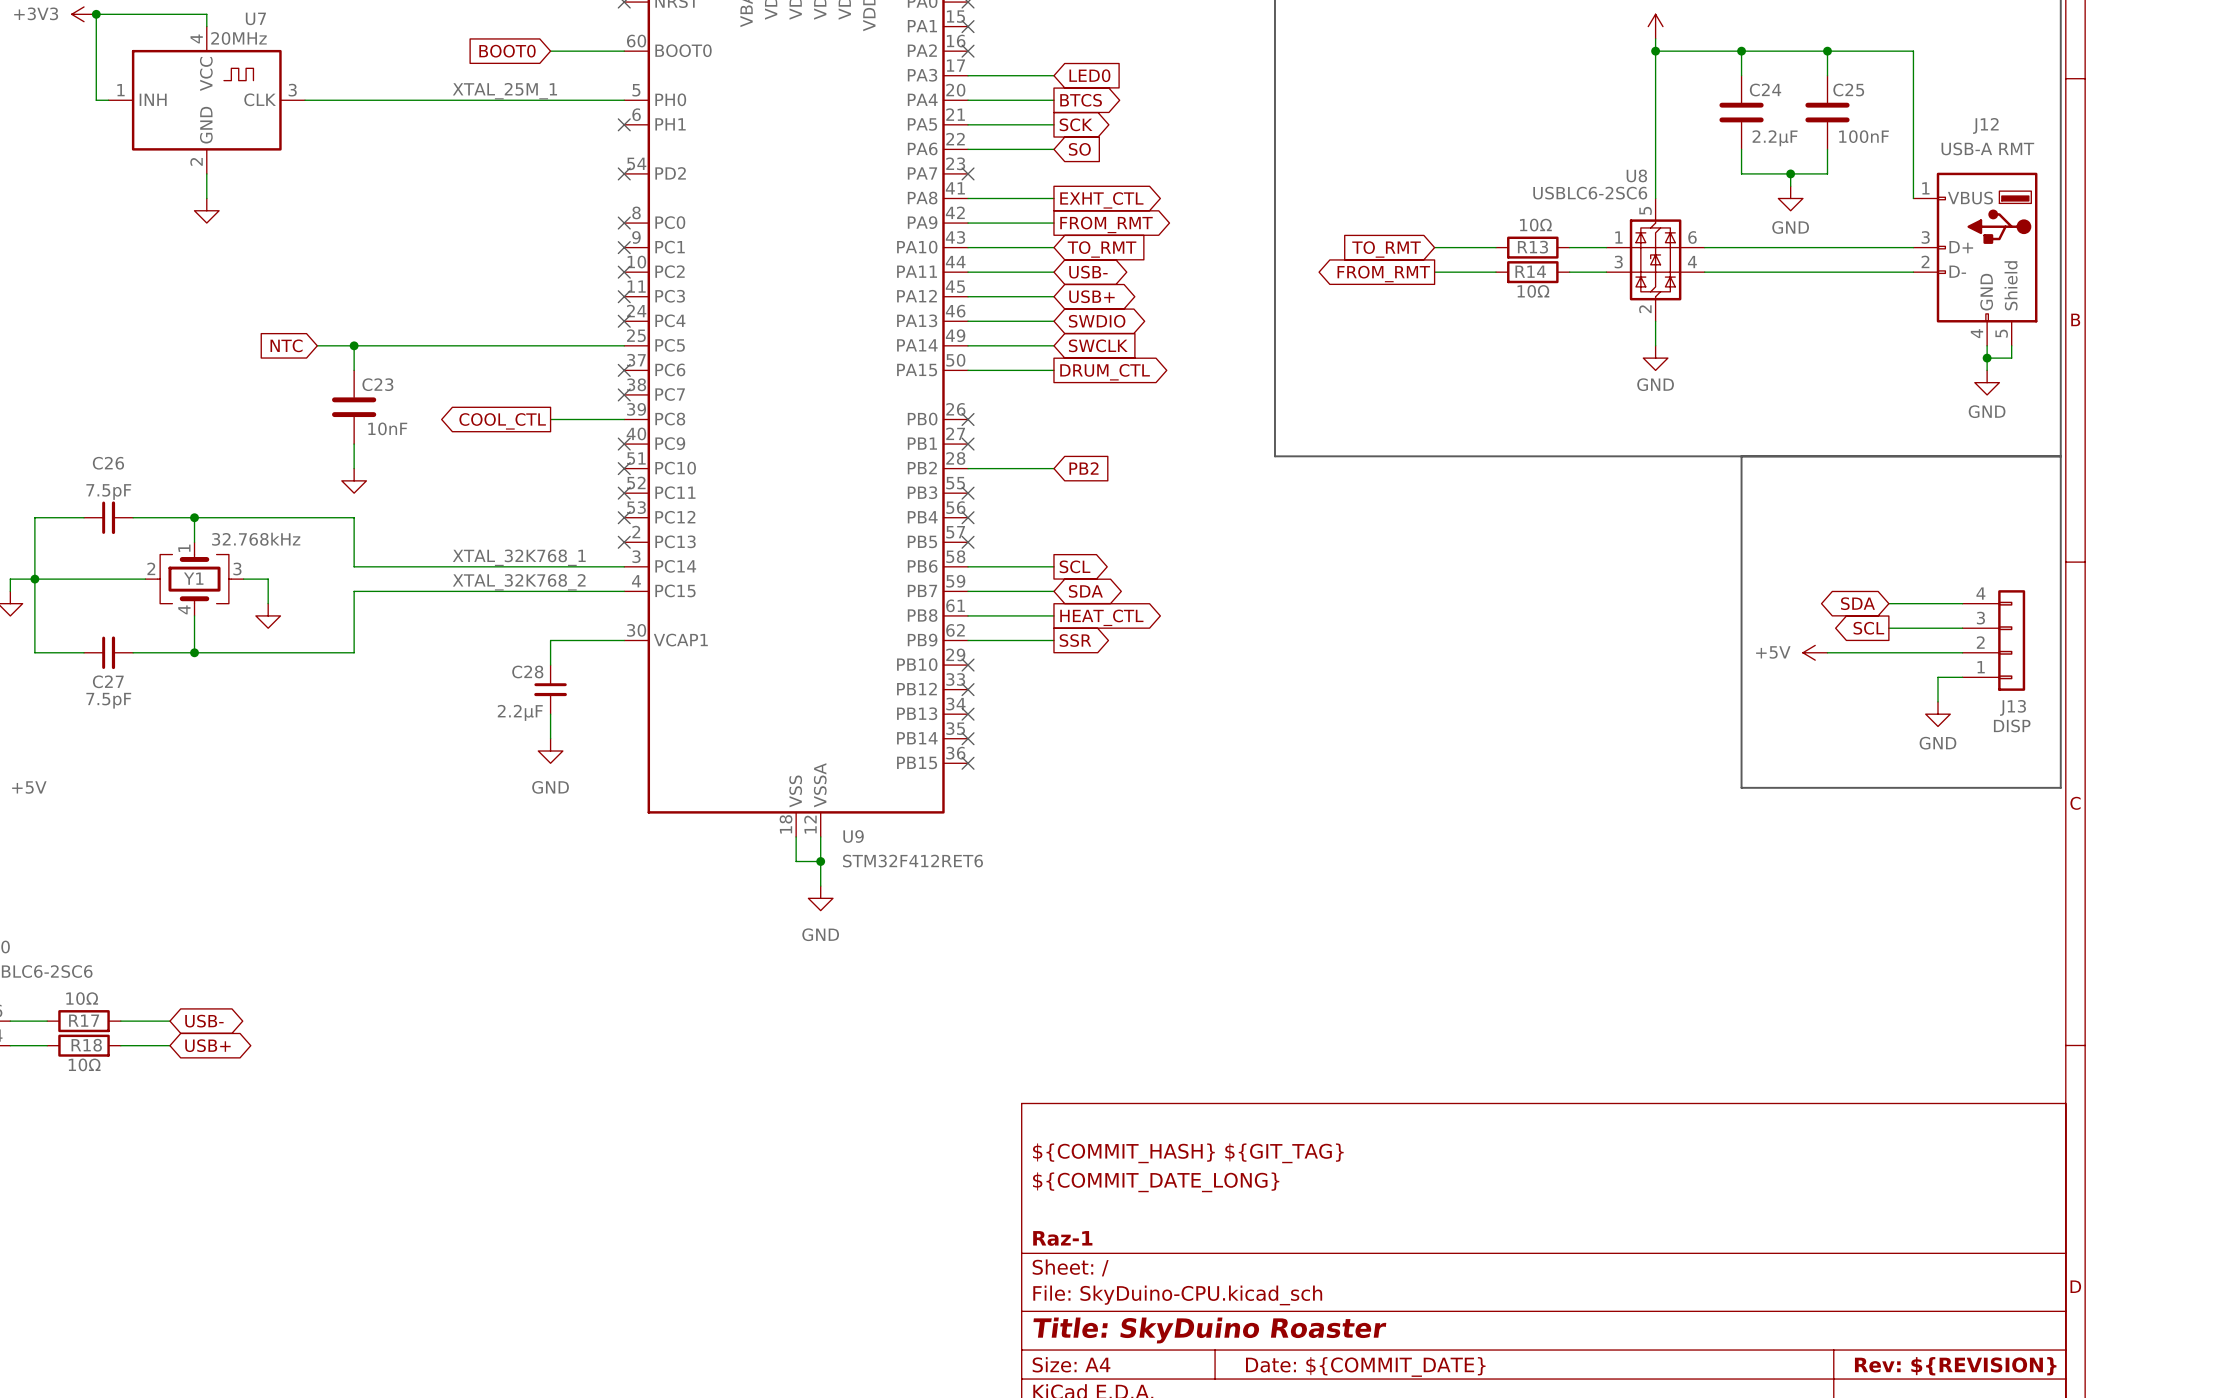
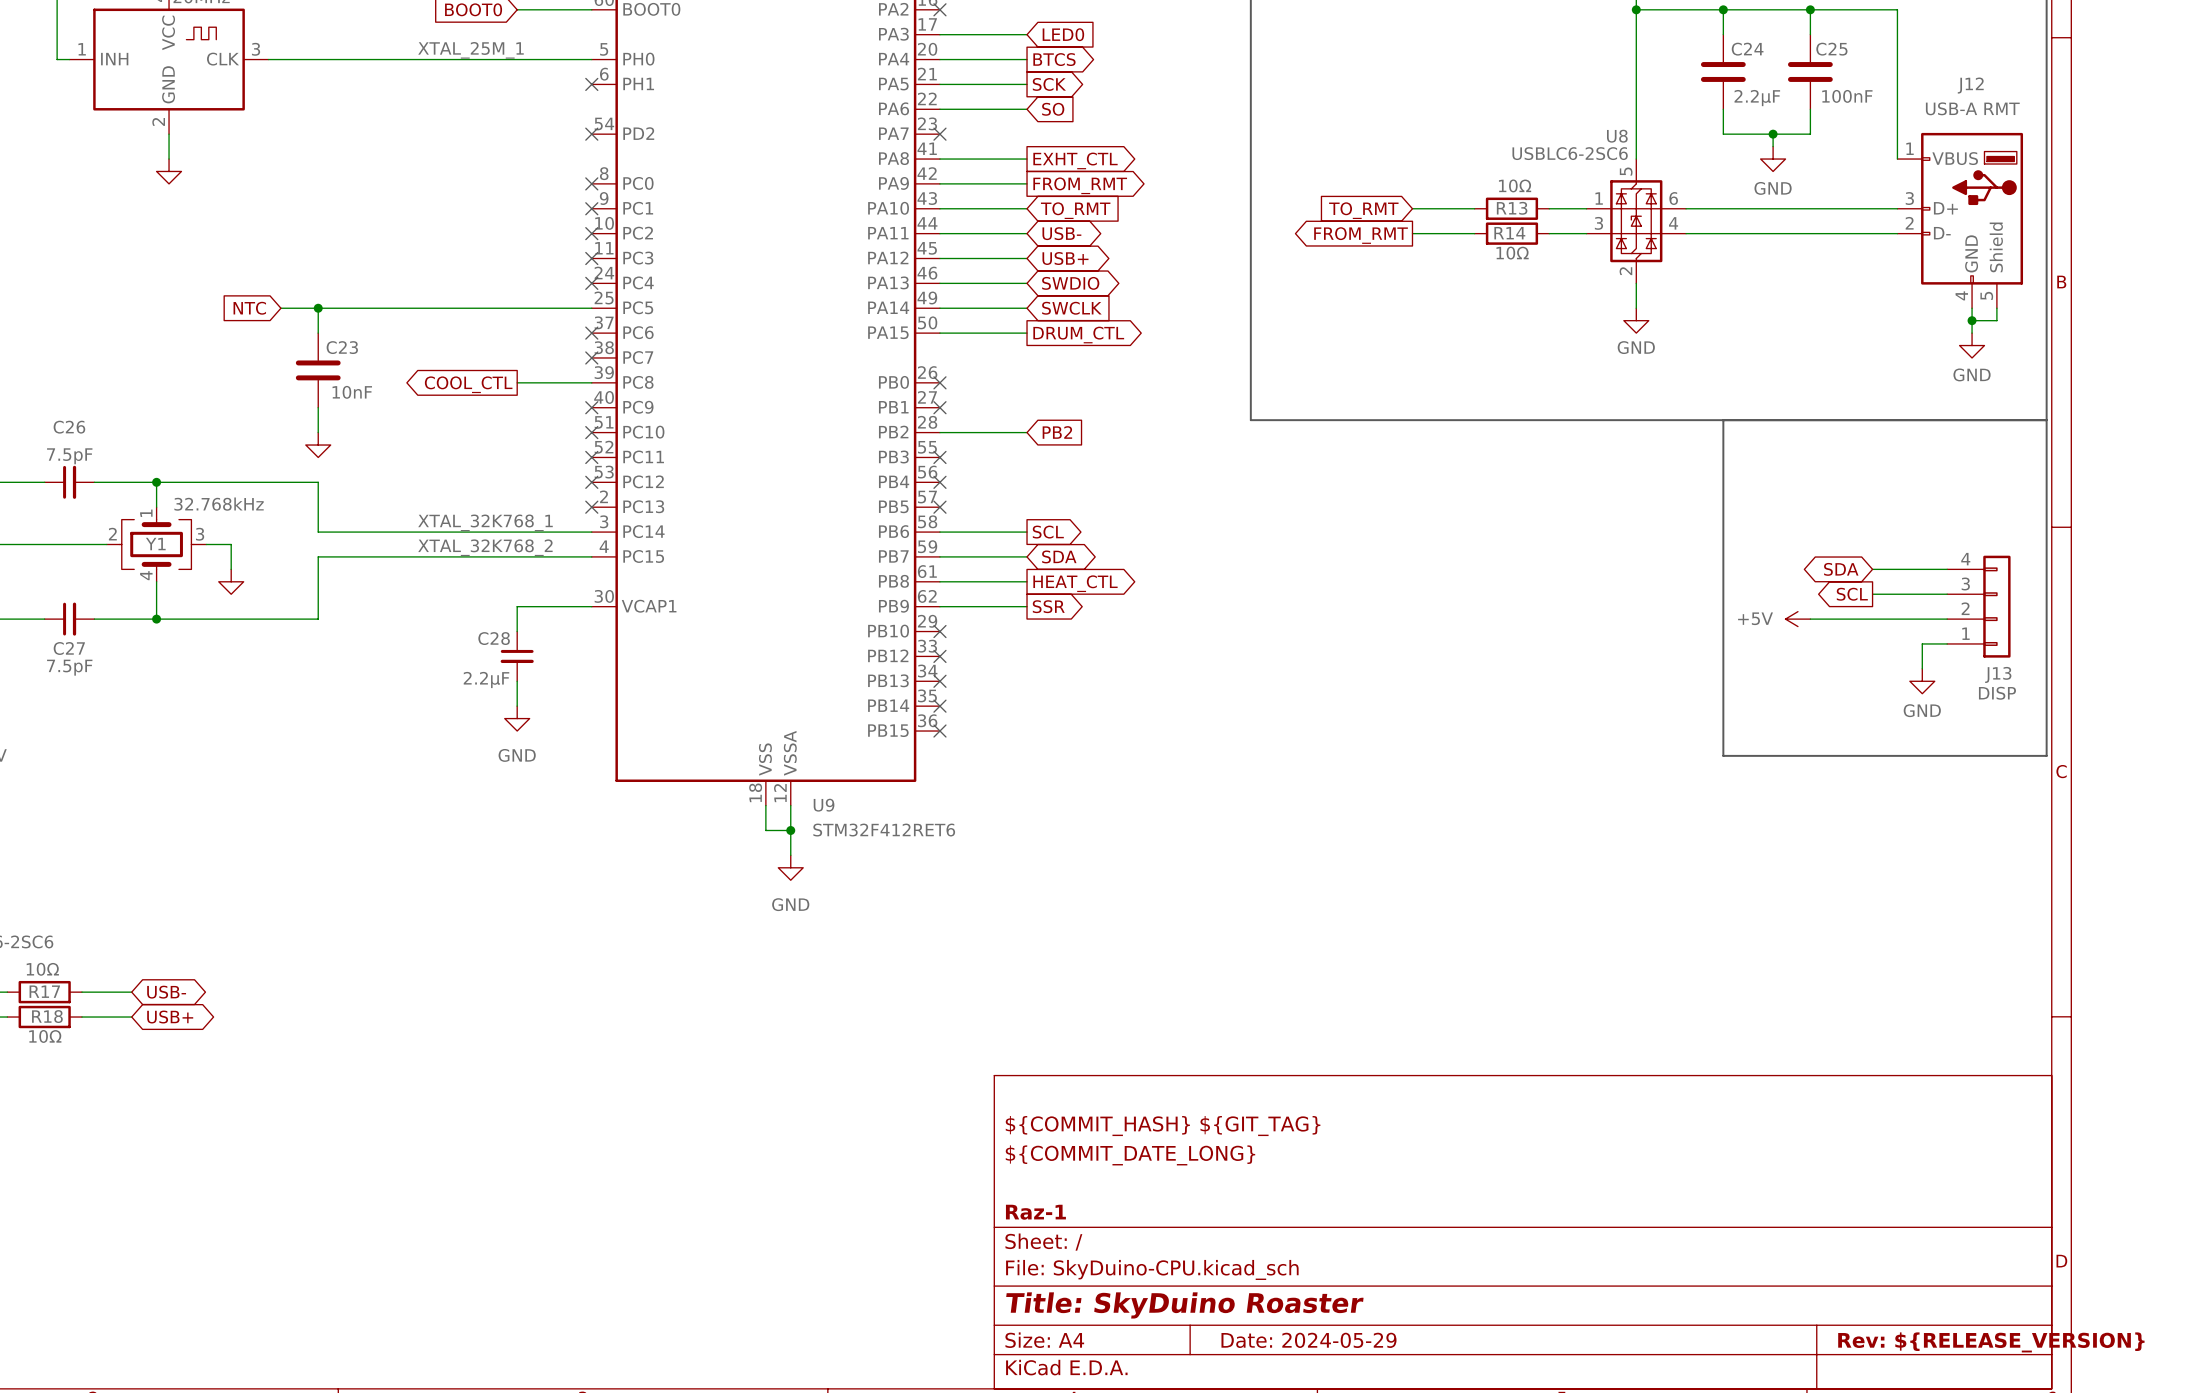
title block: Date: ${COMMIT_DATE} (1365, 1366) -> Date: 2024-05-29 (1308, 1340)
title block: Rev: ${REVISION} (1955, 1366) -> Rev: ${RELEASE_VERSION} (1991, 1342)

